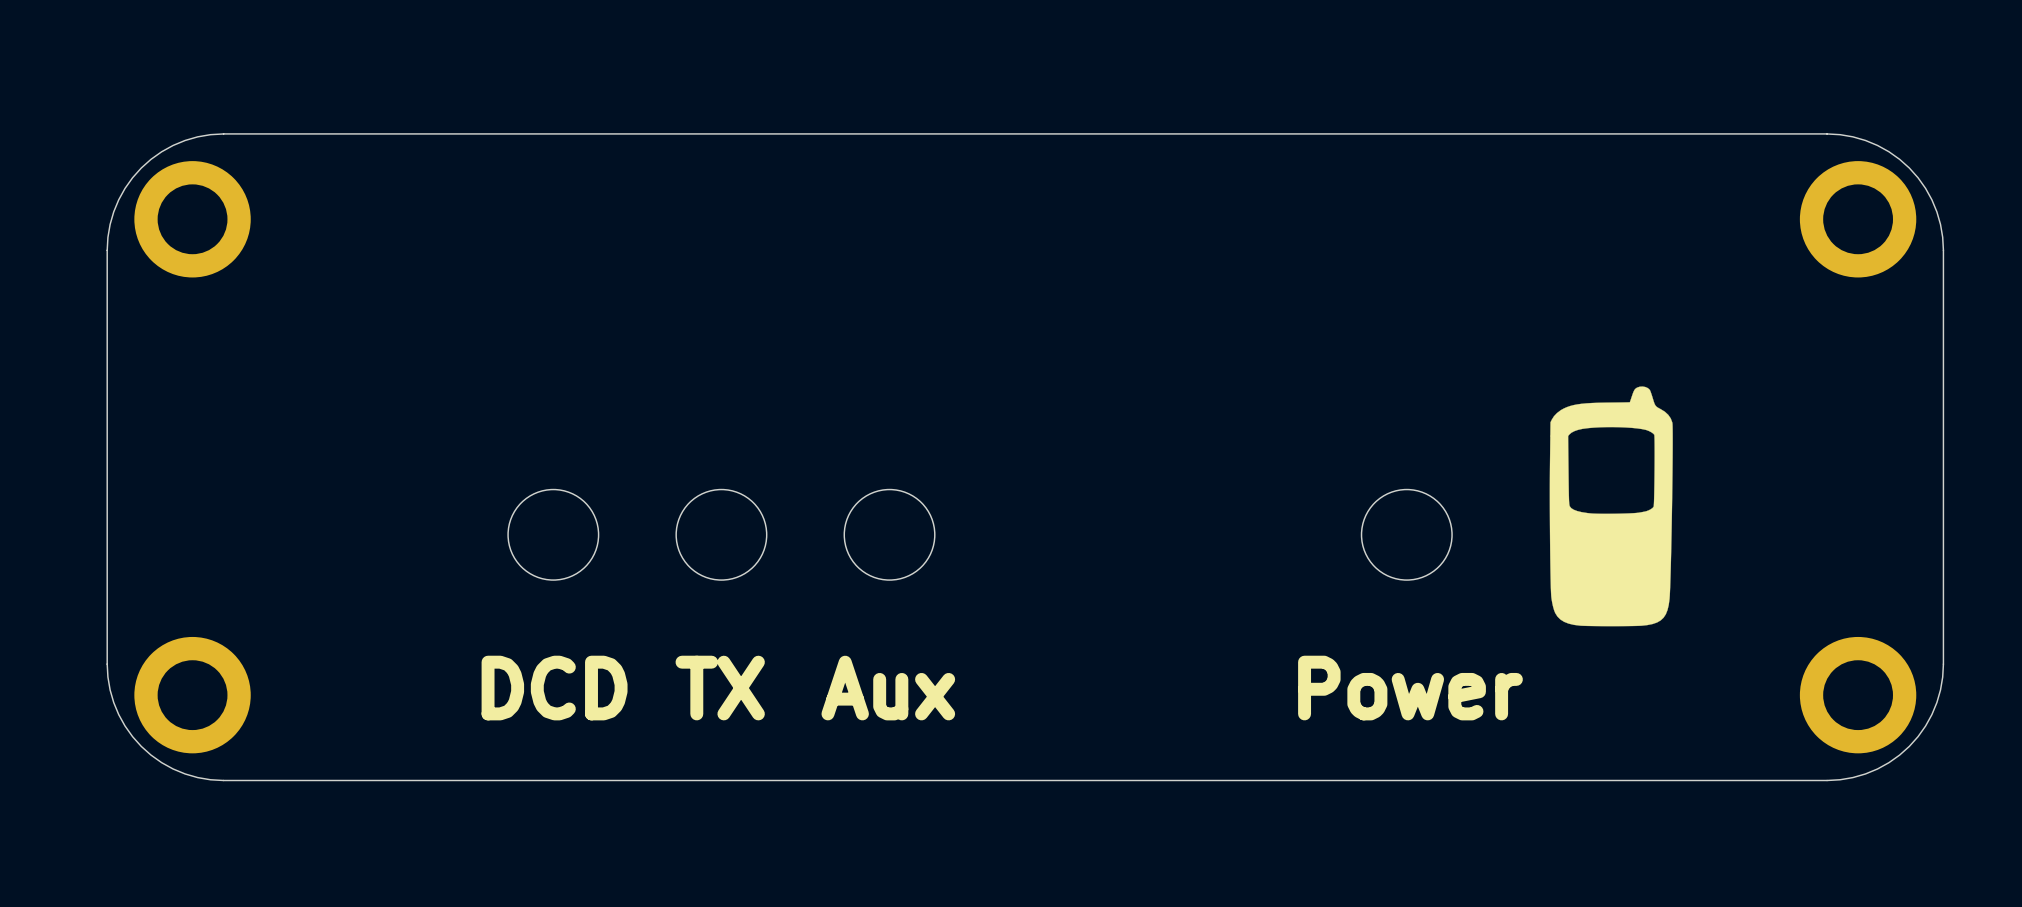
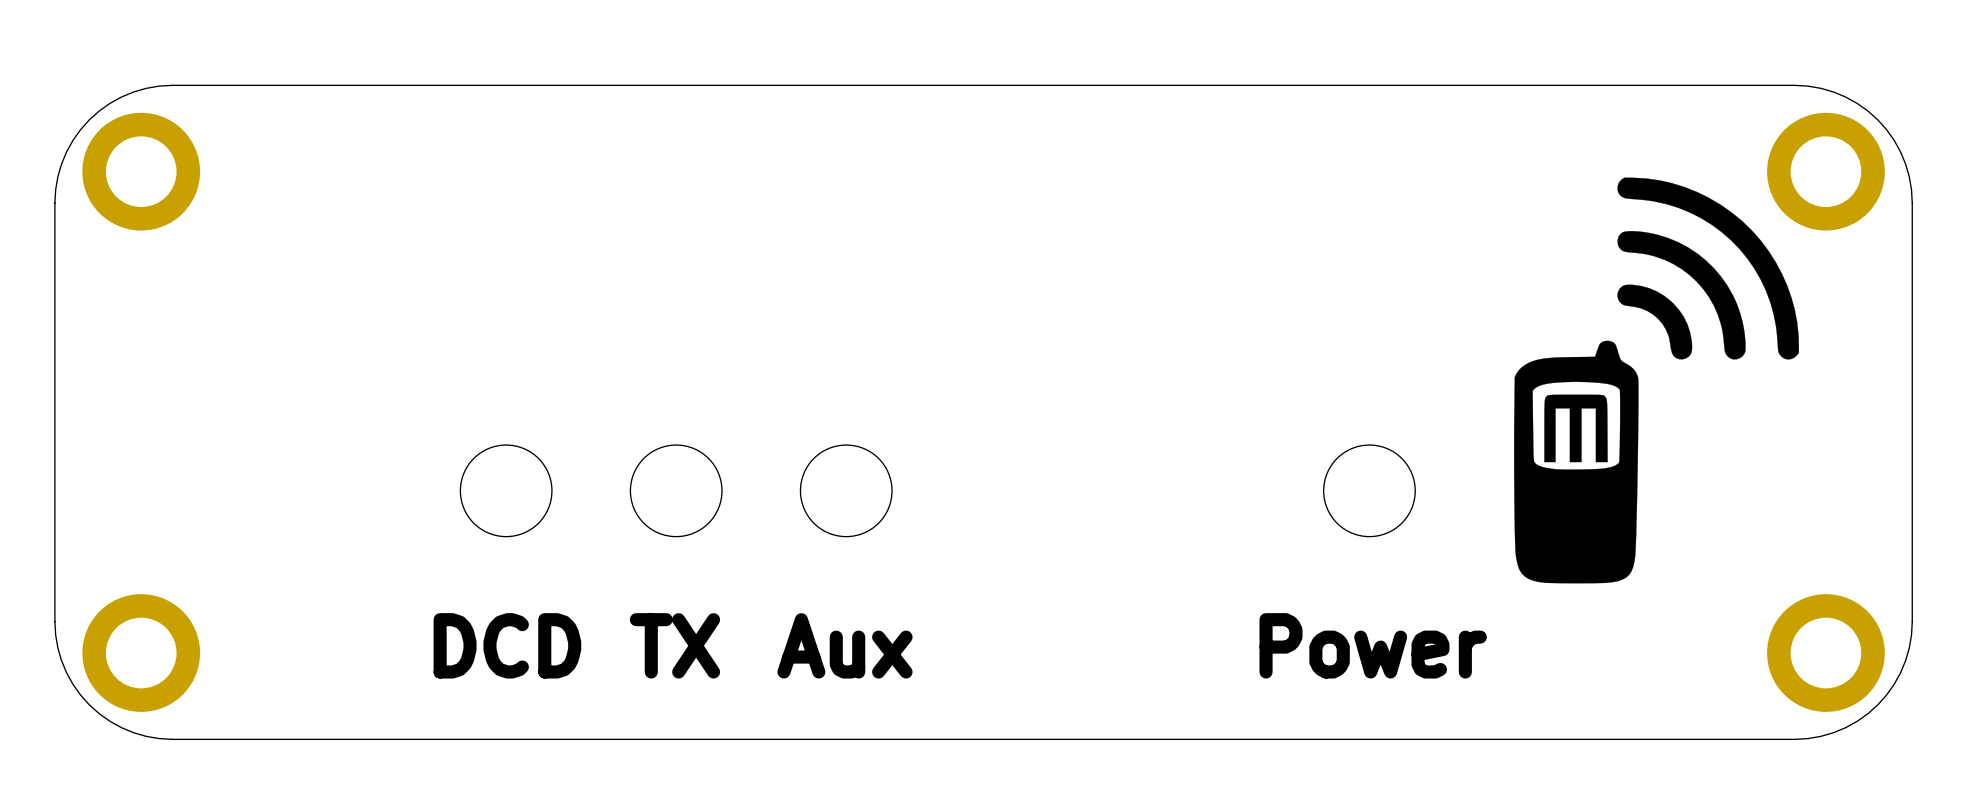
drawing: none -> [1514, 177, 1799, 584]

